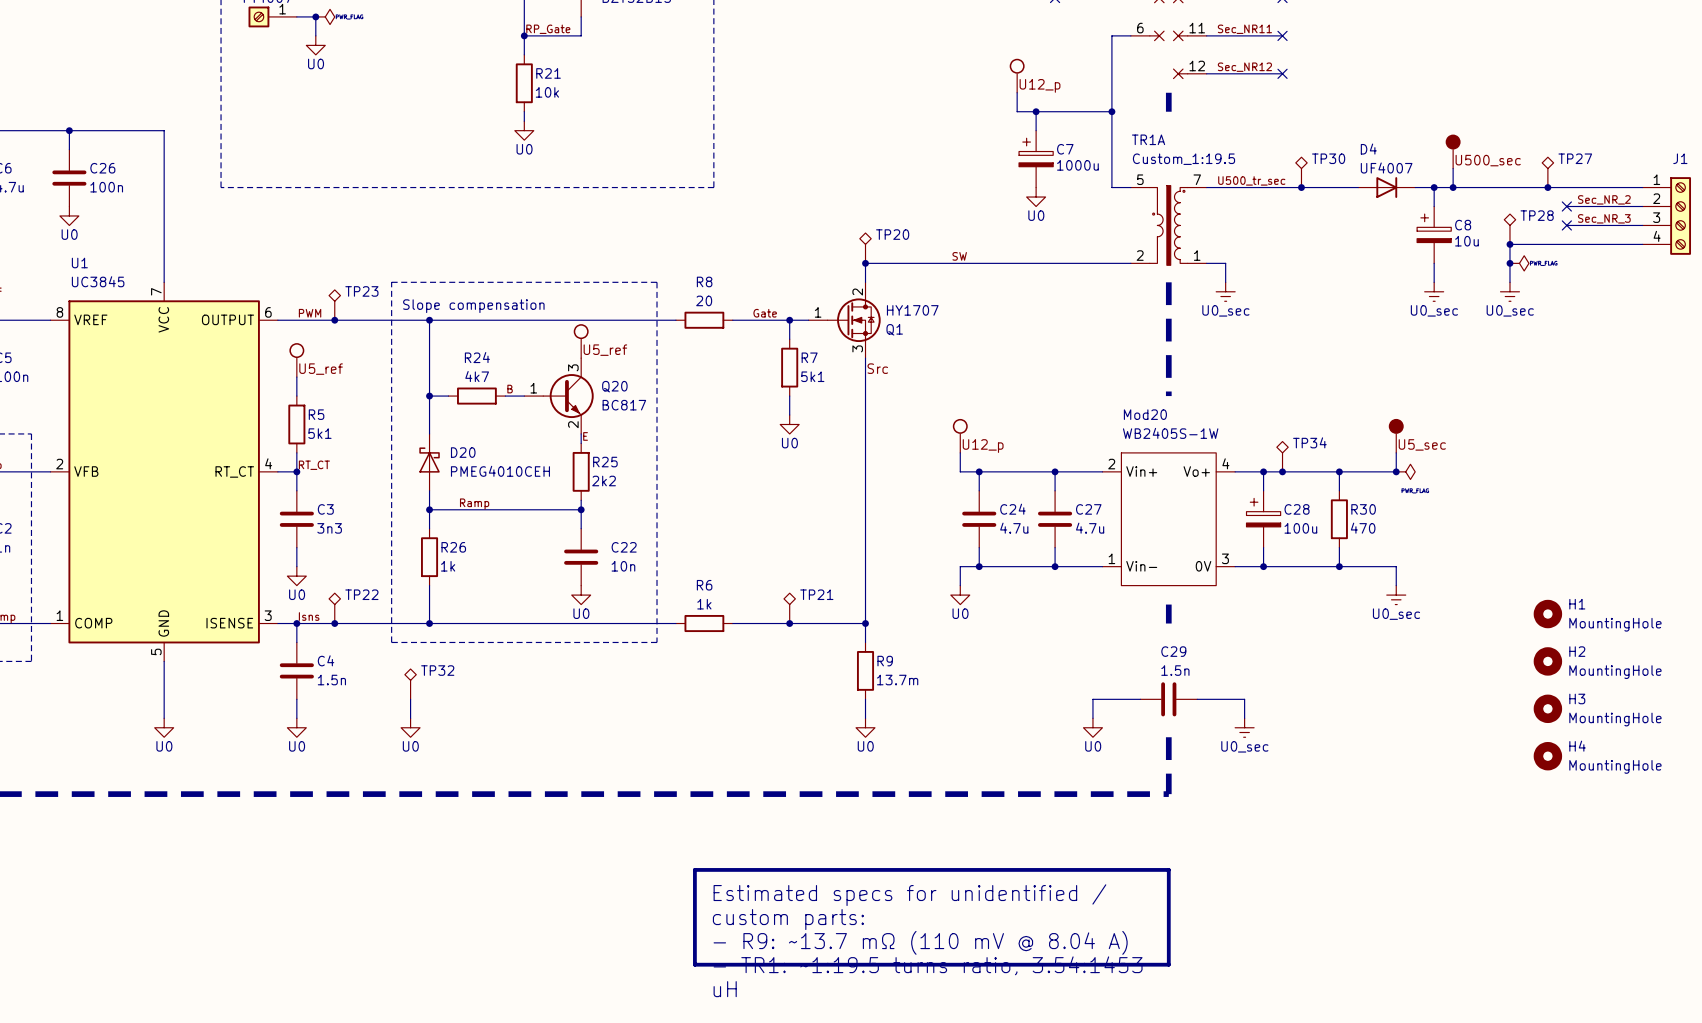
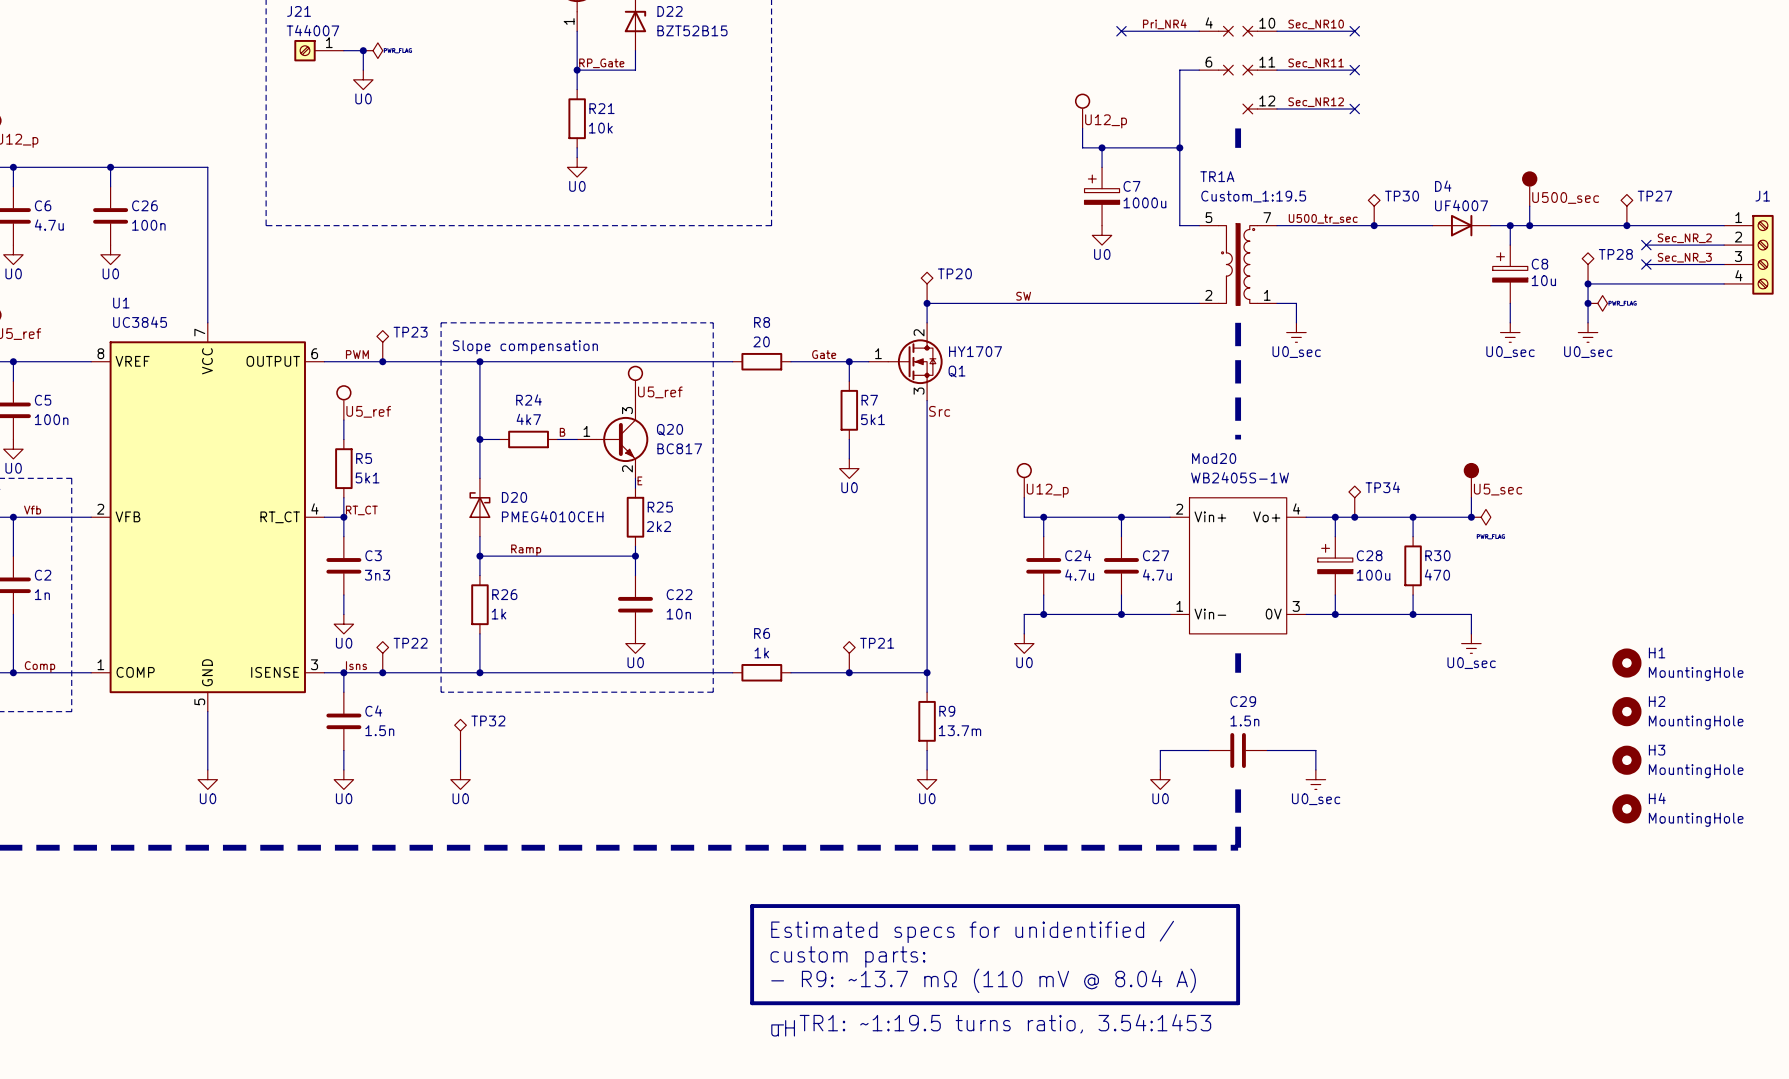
line: (694, 869) (1168, 869) -> (752, 925) (752, 906) (1238, 906) (1238, 925)
text position: Estimated specs for unidentified / (909, 895) -> Estimated specs for unidentified / (972, 931)
text position: custom parts: (788, 919) -> custom parts: (848, 956)
text position: - R9: ~13.7 mΩ (110 mV @ 8.04 A) (920, 942) -> - R9: ~13.7 mΩ (110 mV @ 8.04 A) (983, 980)
line: (694, 945) (694, 964) (1168, 964) (1168, 945) -> (752, 1003) (1238, 1003)
text position: uH (725, 989) -> uH (783, 1028)

